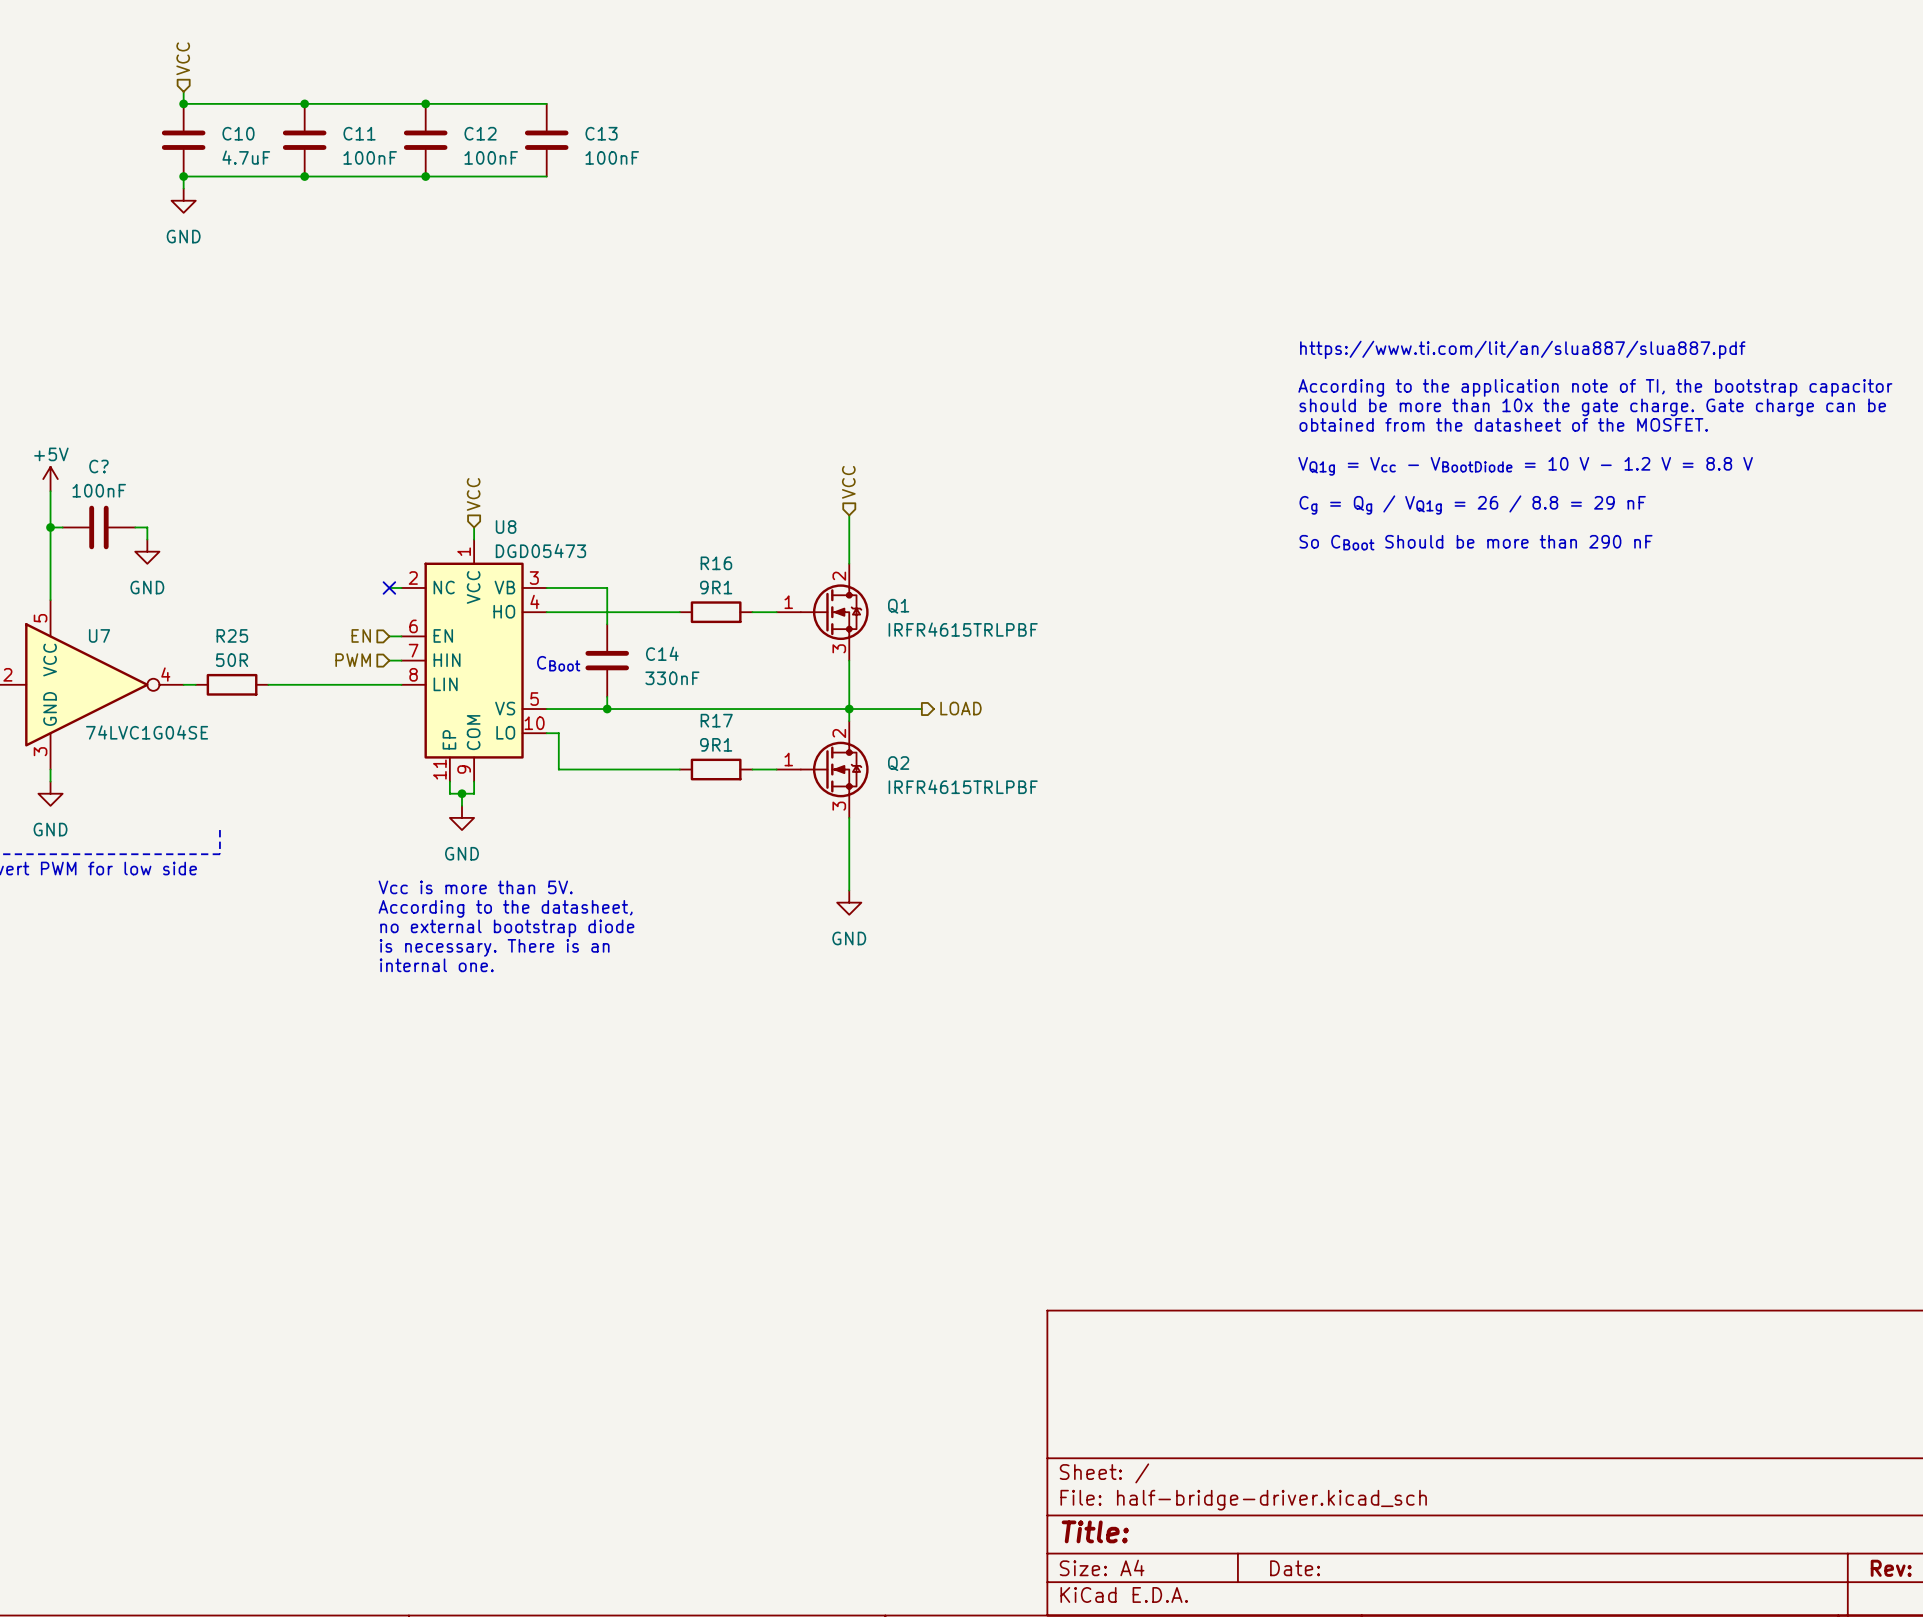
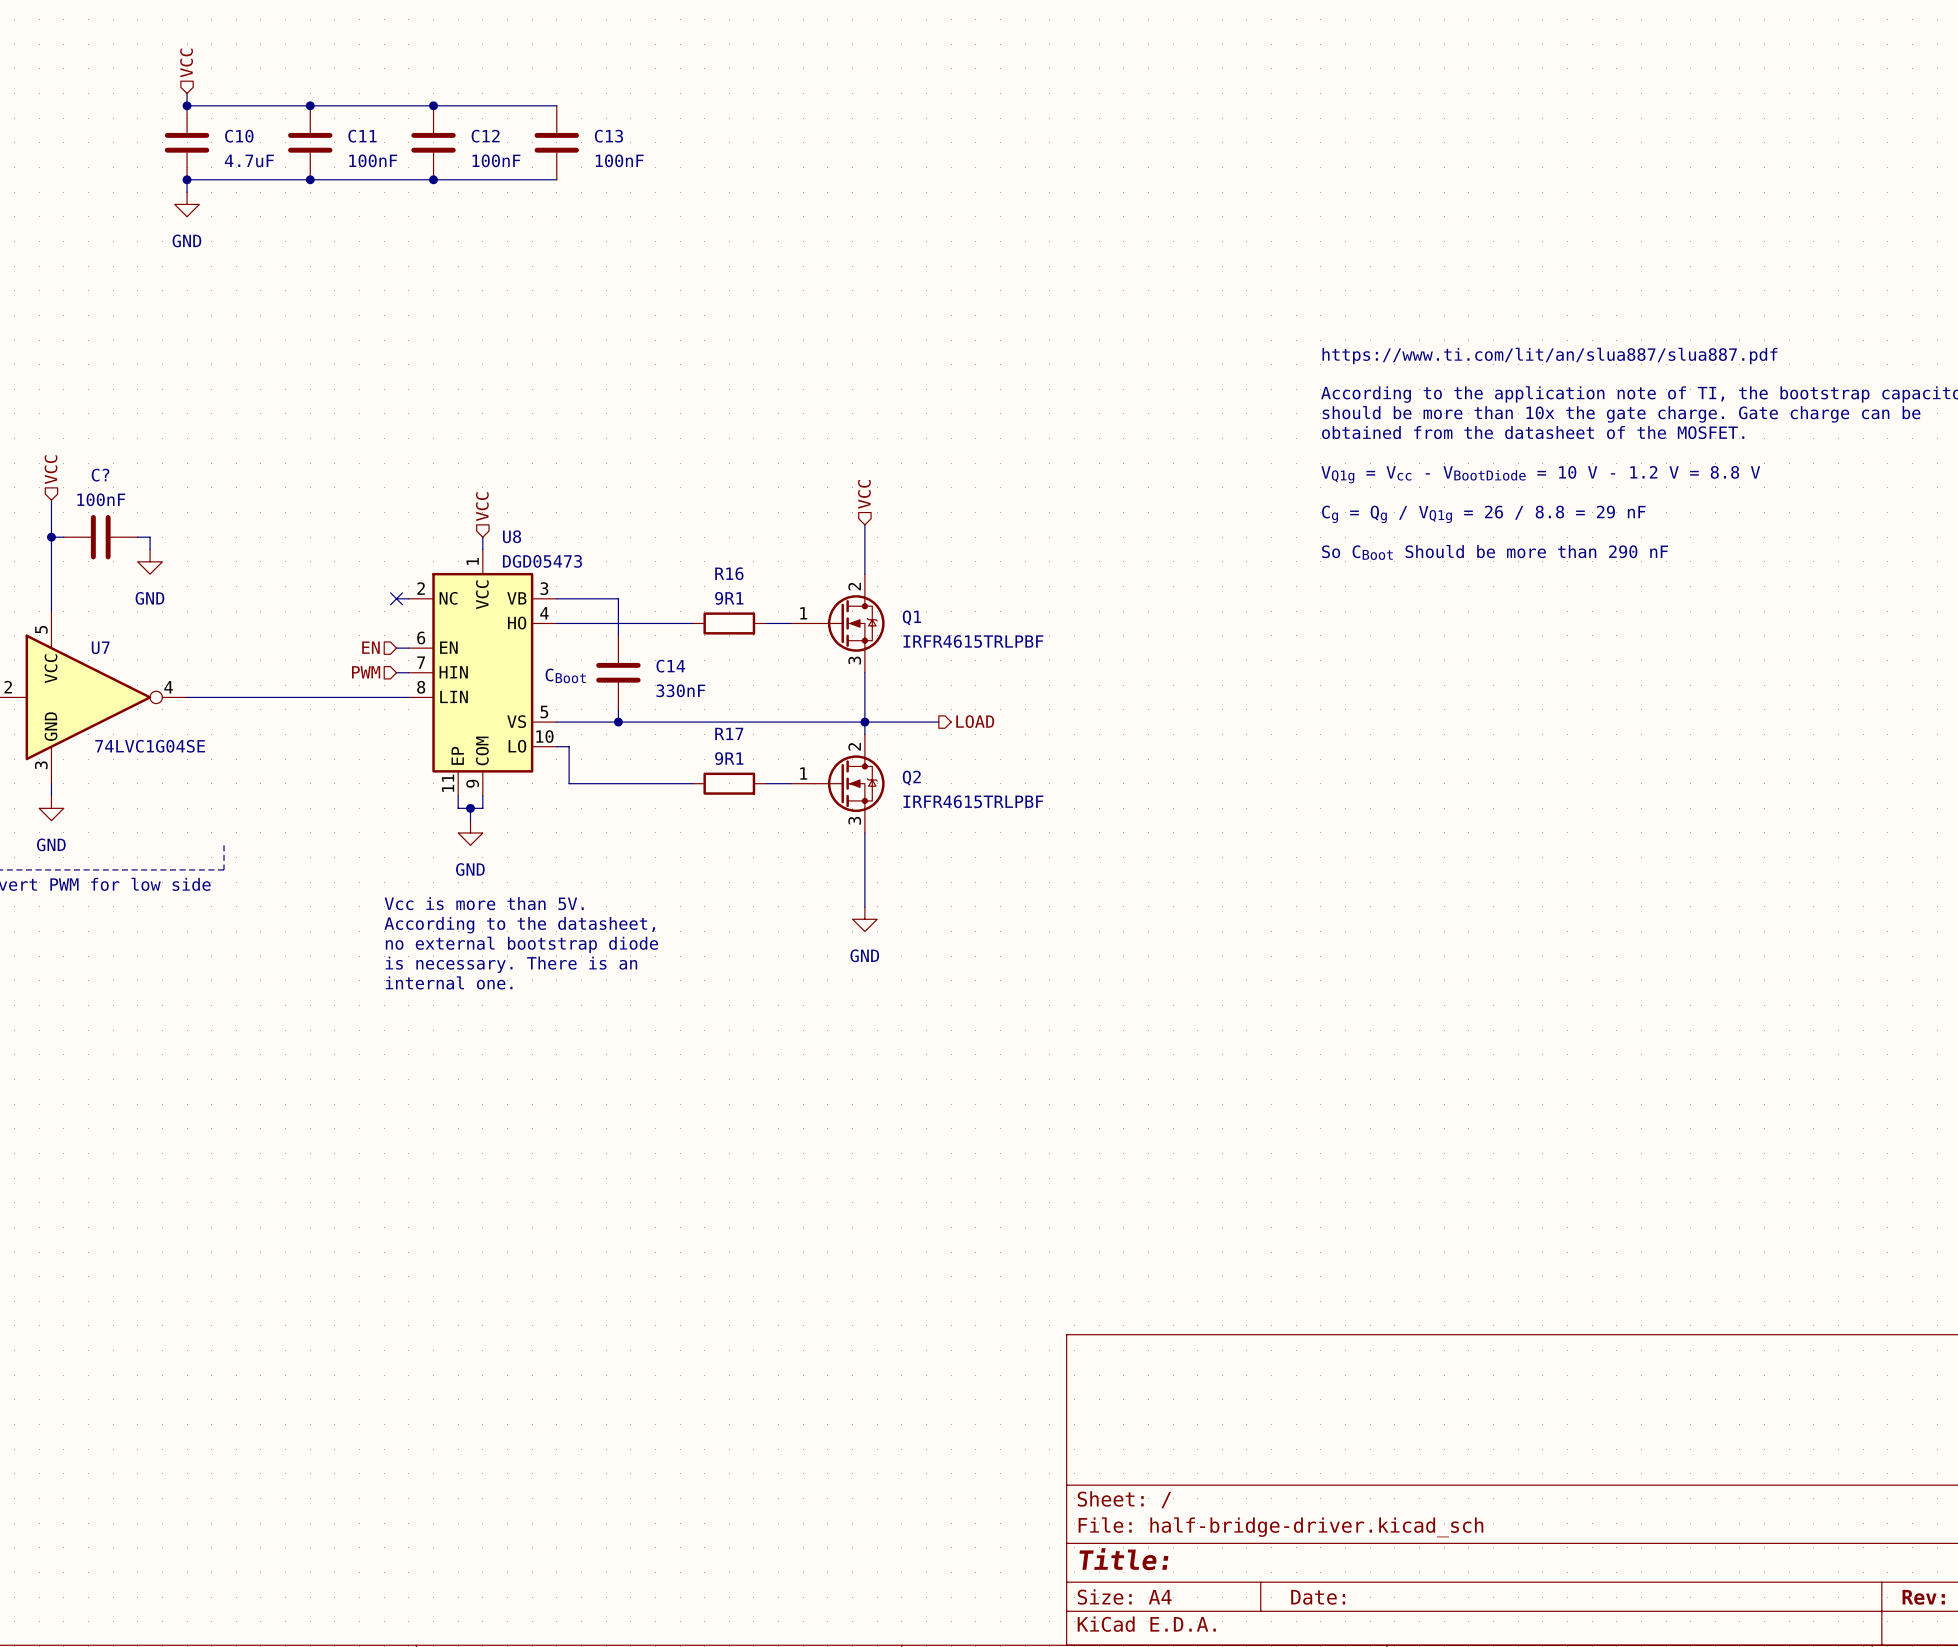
hierarchical label: none -> VCC (51, 469)
power symbol: +5V (50, 479) -> none
wire: none -> (199, 697) (273, 697)
R25: 50R (232, 684) -> none

